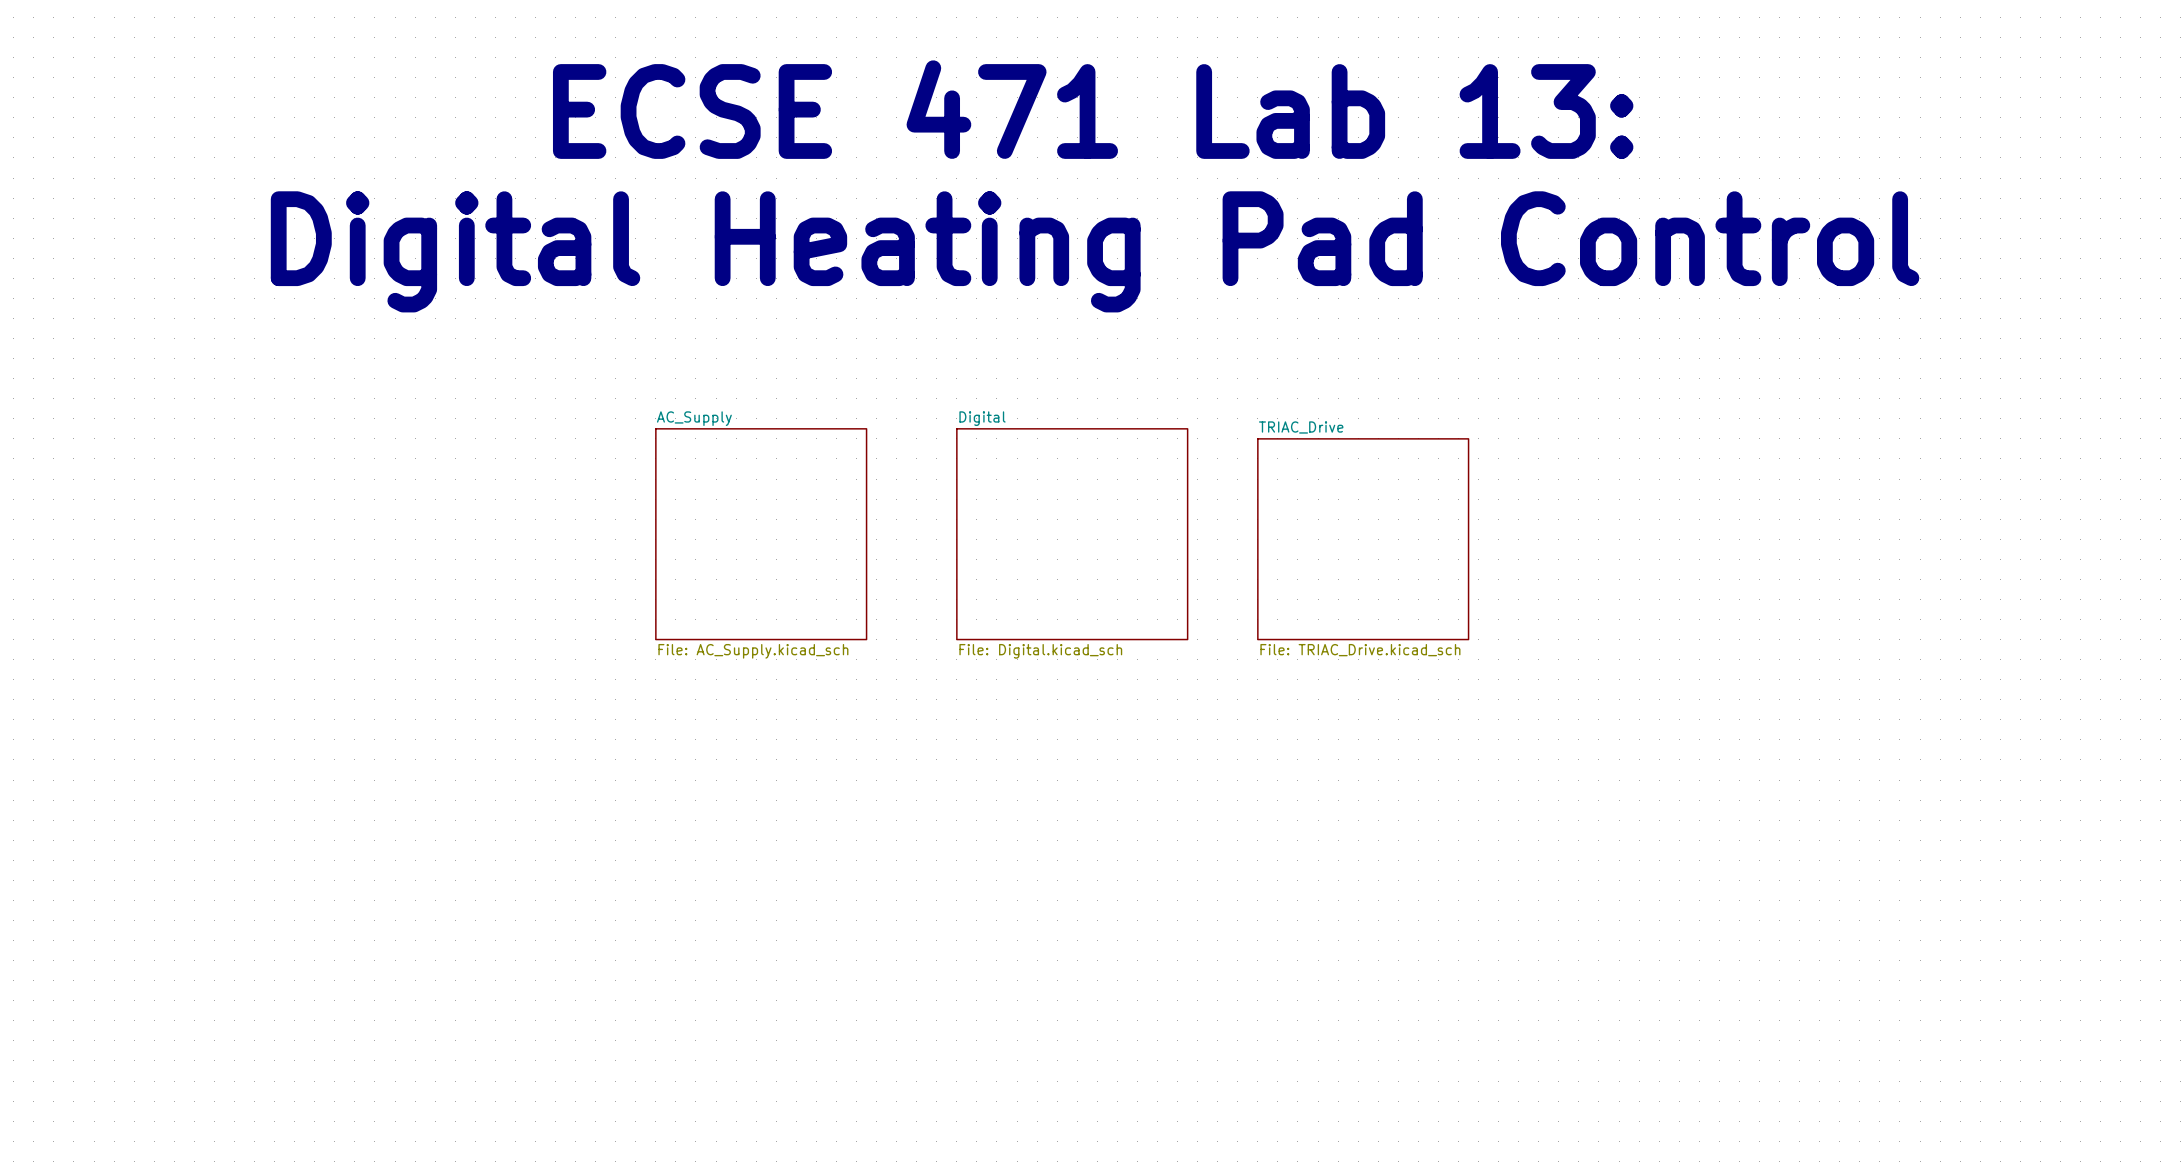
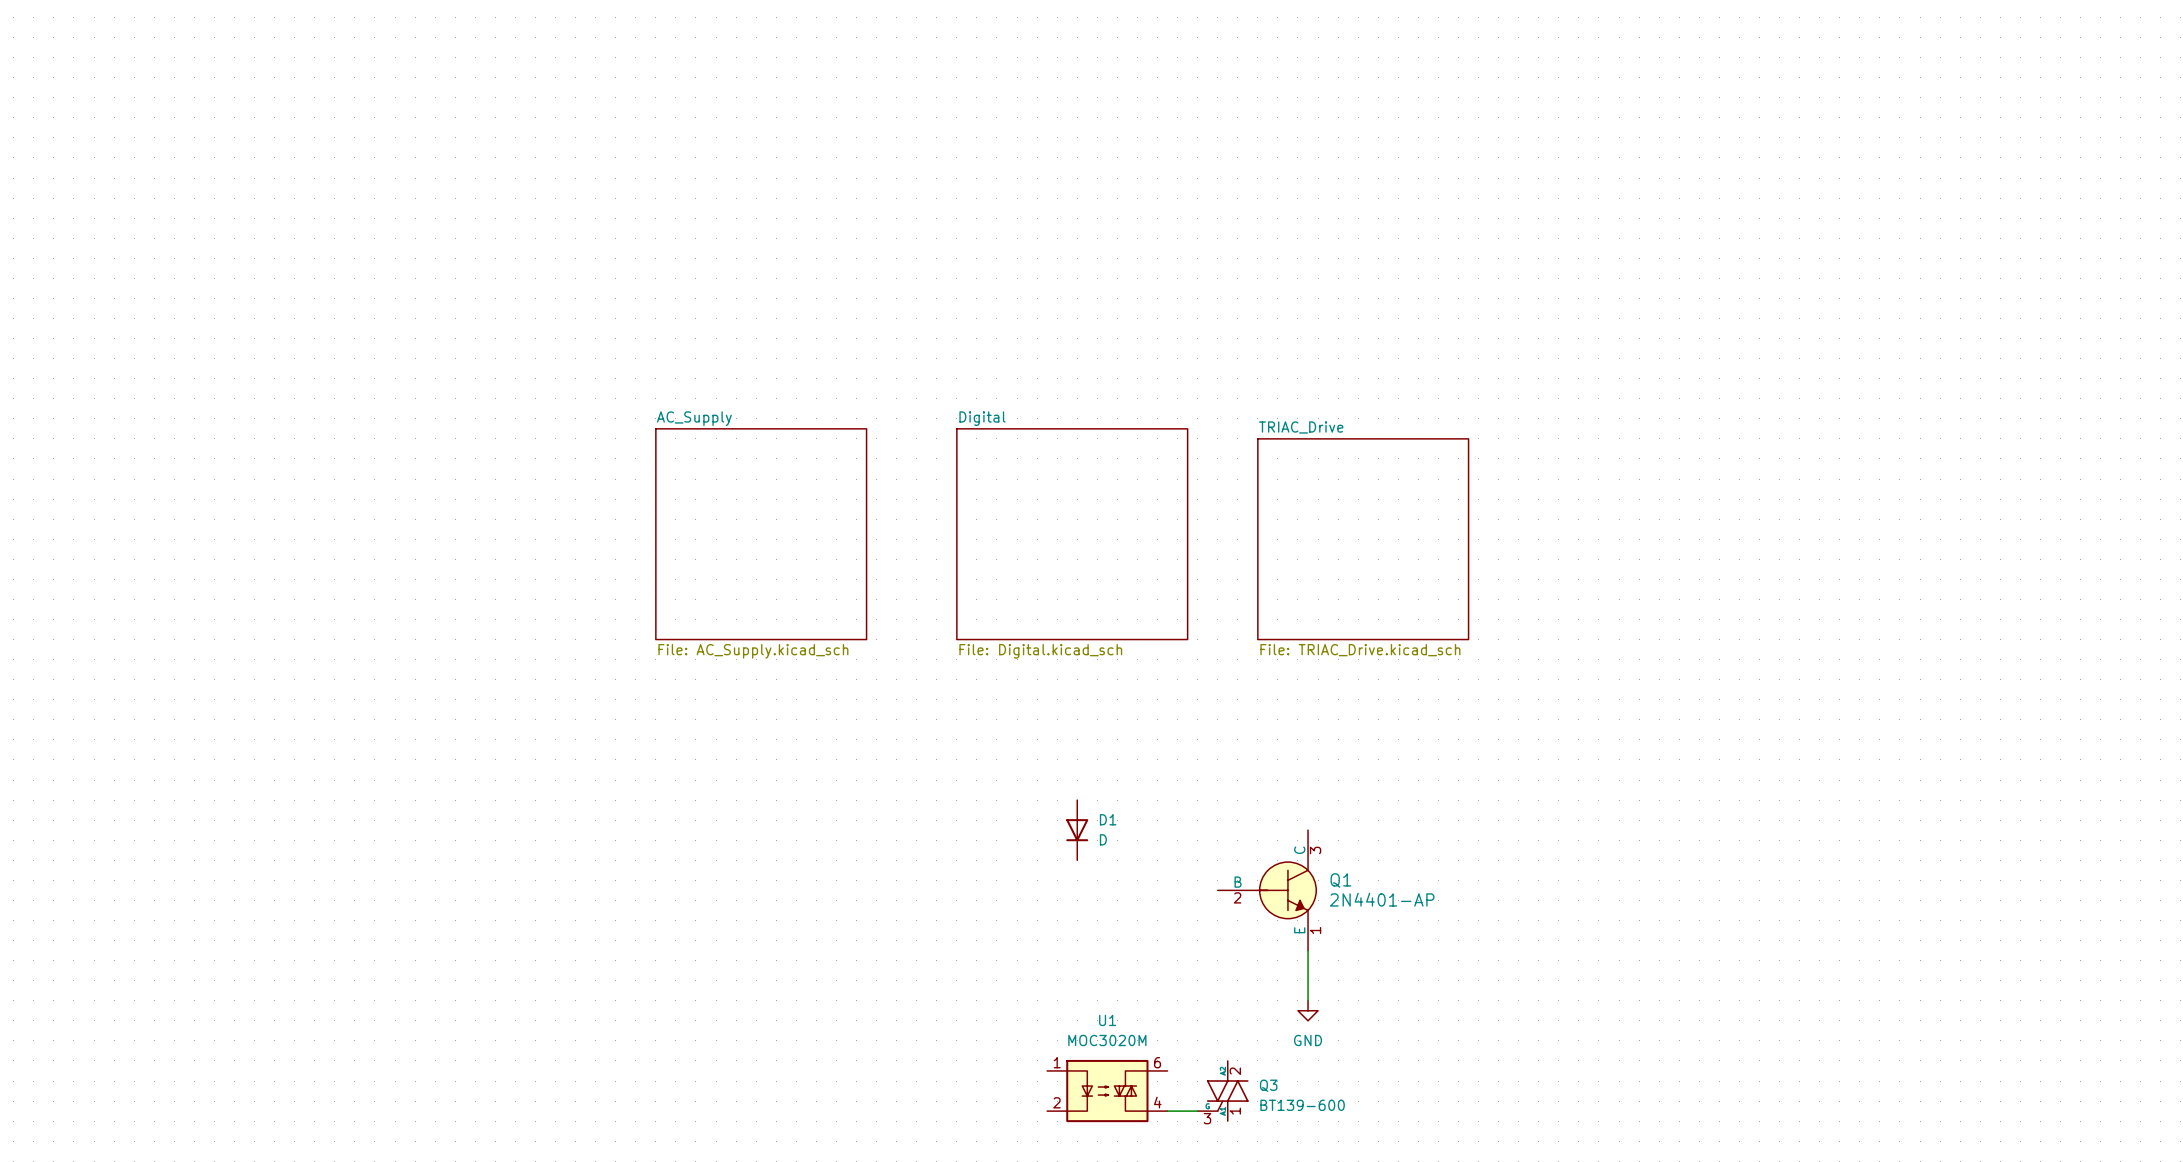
text: ECSE 471 Lab 13: (1093, 109) -> none
text: Digital Heating Pad Control (1095, 251) -> none
D1: none -> D (1077, 830)
Q1: none -> 2N4401-AP (1266, 890)
wire: none -> (1308, 950) (1308, 1000)
power symbol: none -> GND (1308, 1010)
U1: none -> MOC3020M (1107, 1091)
Q3: none -> BT139-600 (1223, 1091)
wire: none -> (1167, 1111) (1197, 1111)

